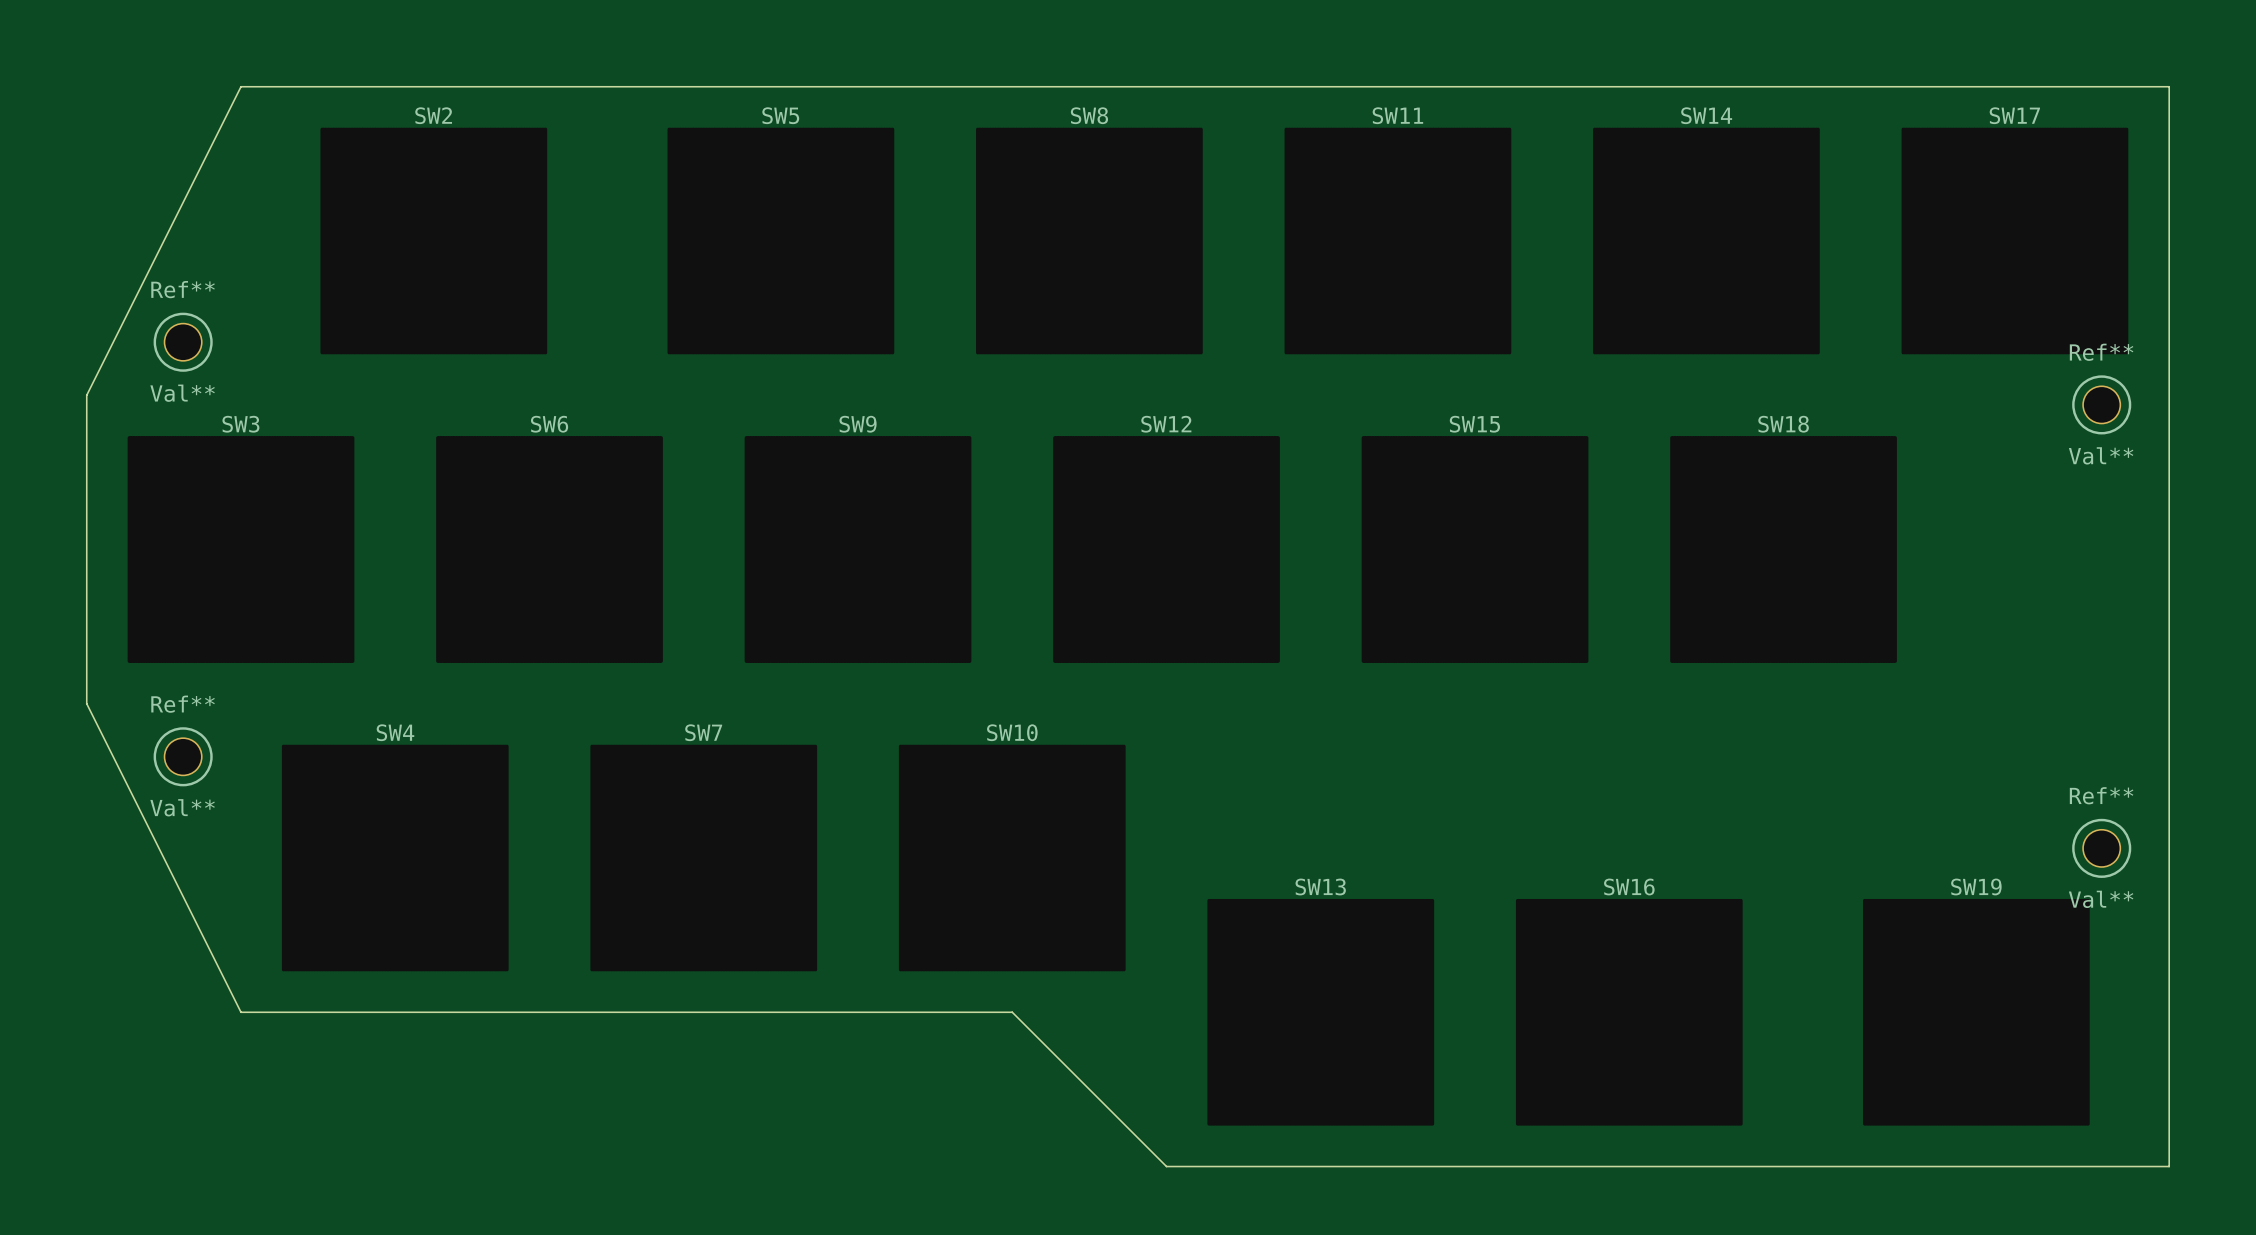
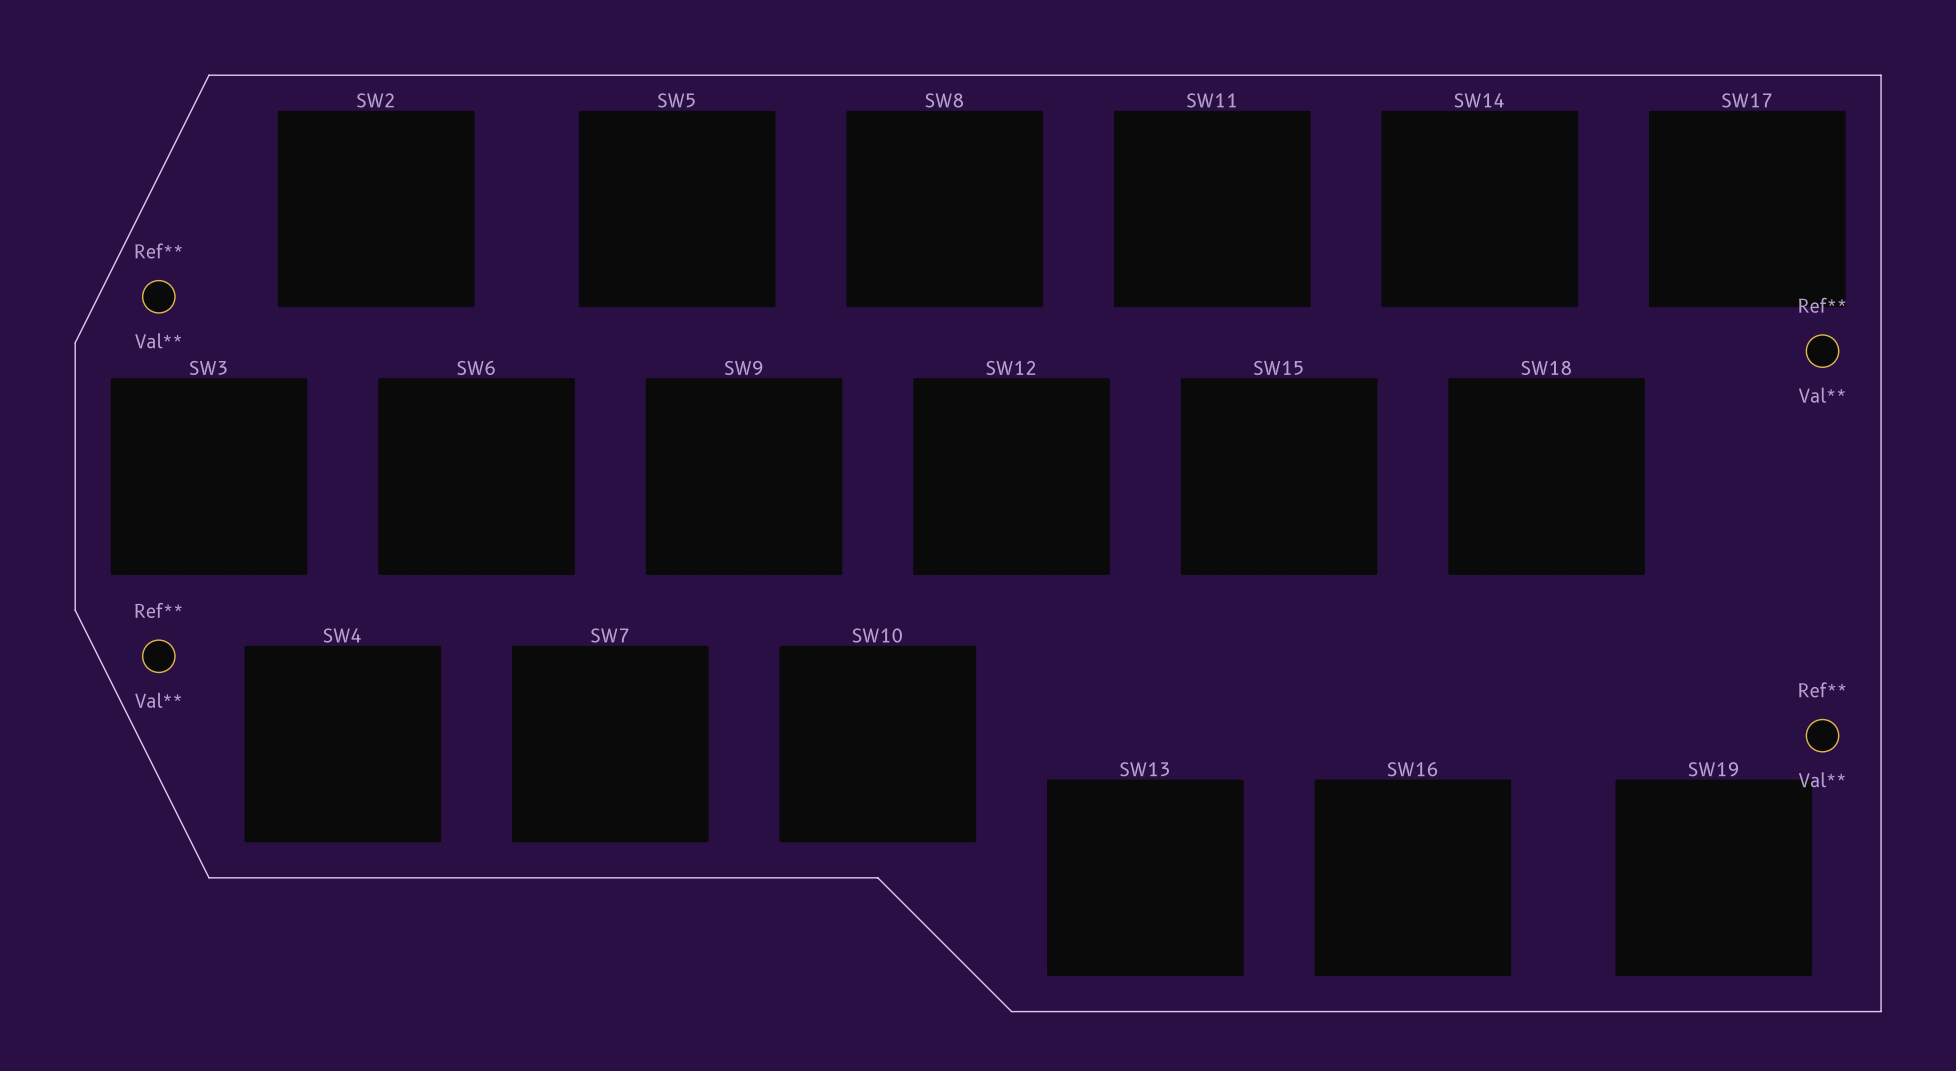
Ref** footprint: [153, 312, 213, 372] -> [141, 279, 176, 314]
Ref** footprint: [2072, 375, 2132, 435] -> [1805, 334, 1840, 368]
Ref** footprint: [153, 727, 213, 787] -> [141, 639, 176, 674]
Ref** footprint: [2072, 818, 2132, 878] -> [1805, 718, 1840, 753]

